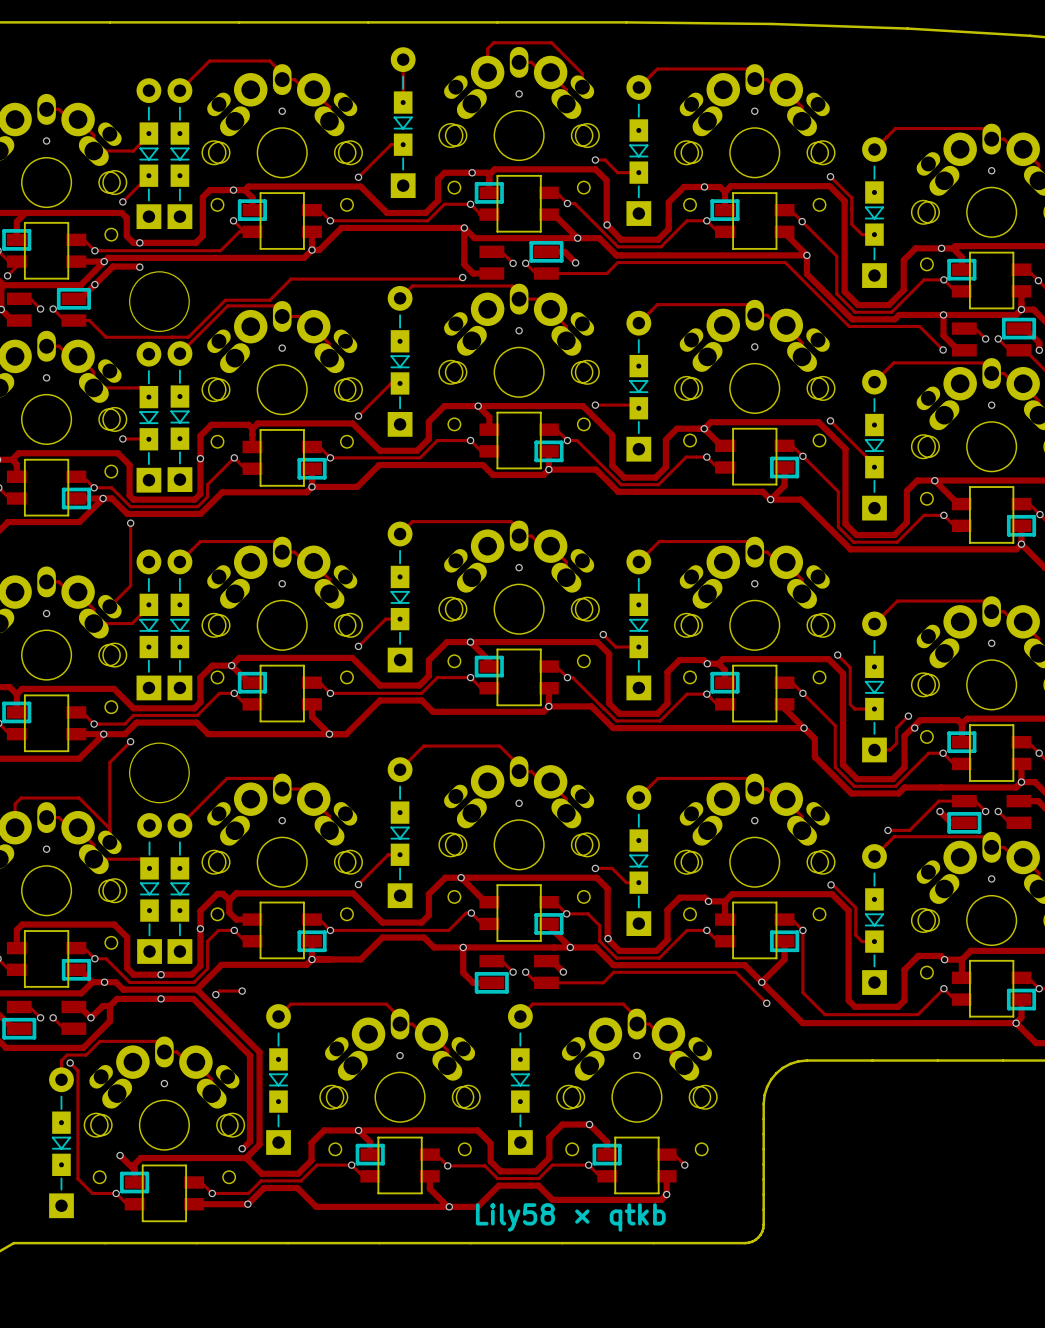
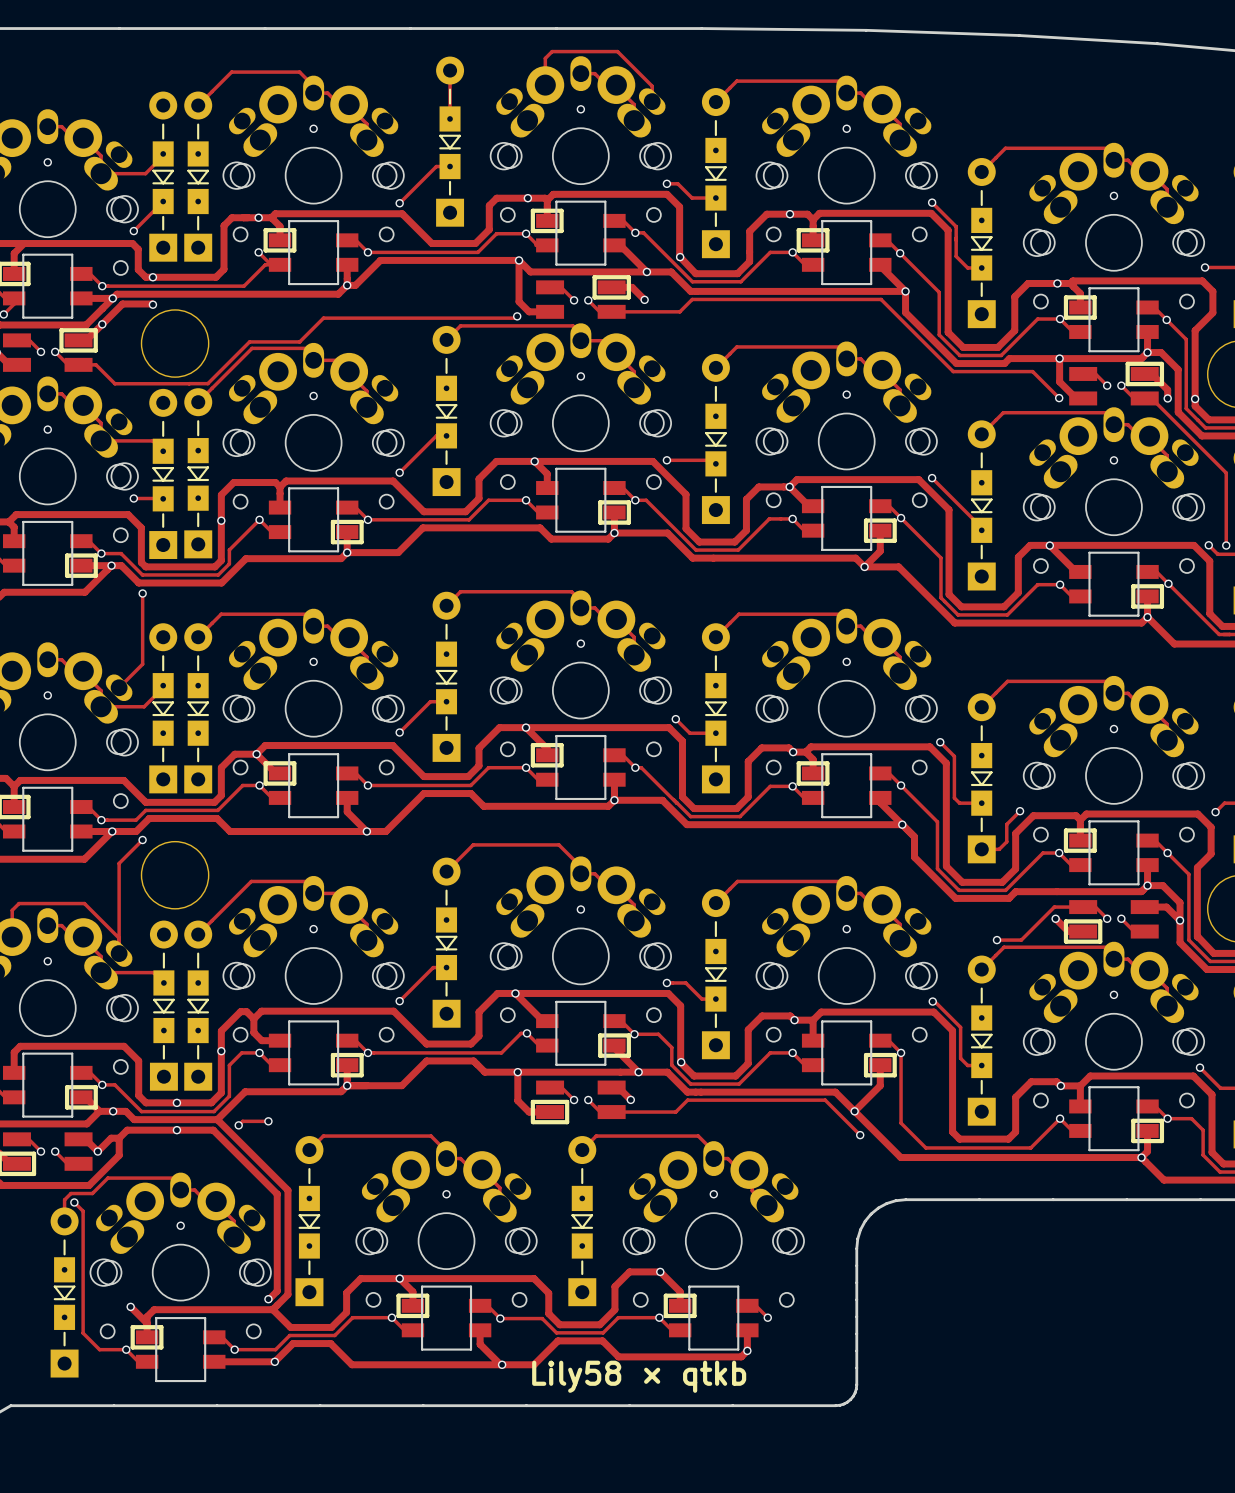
via: (914, 728) -> none

